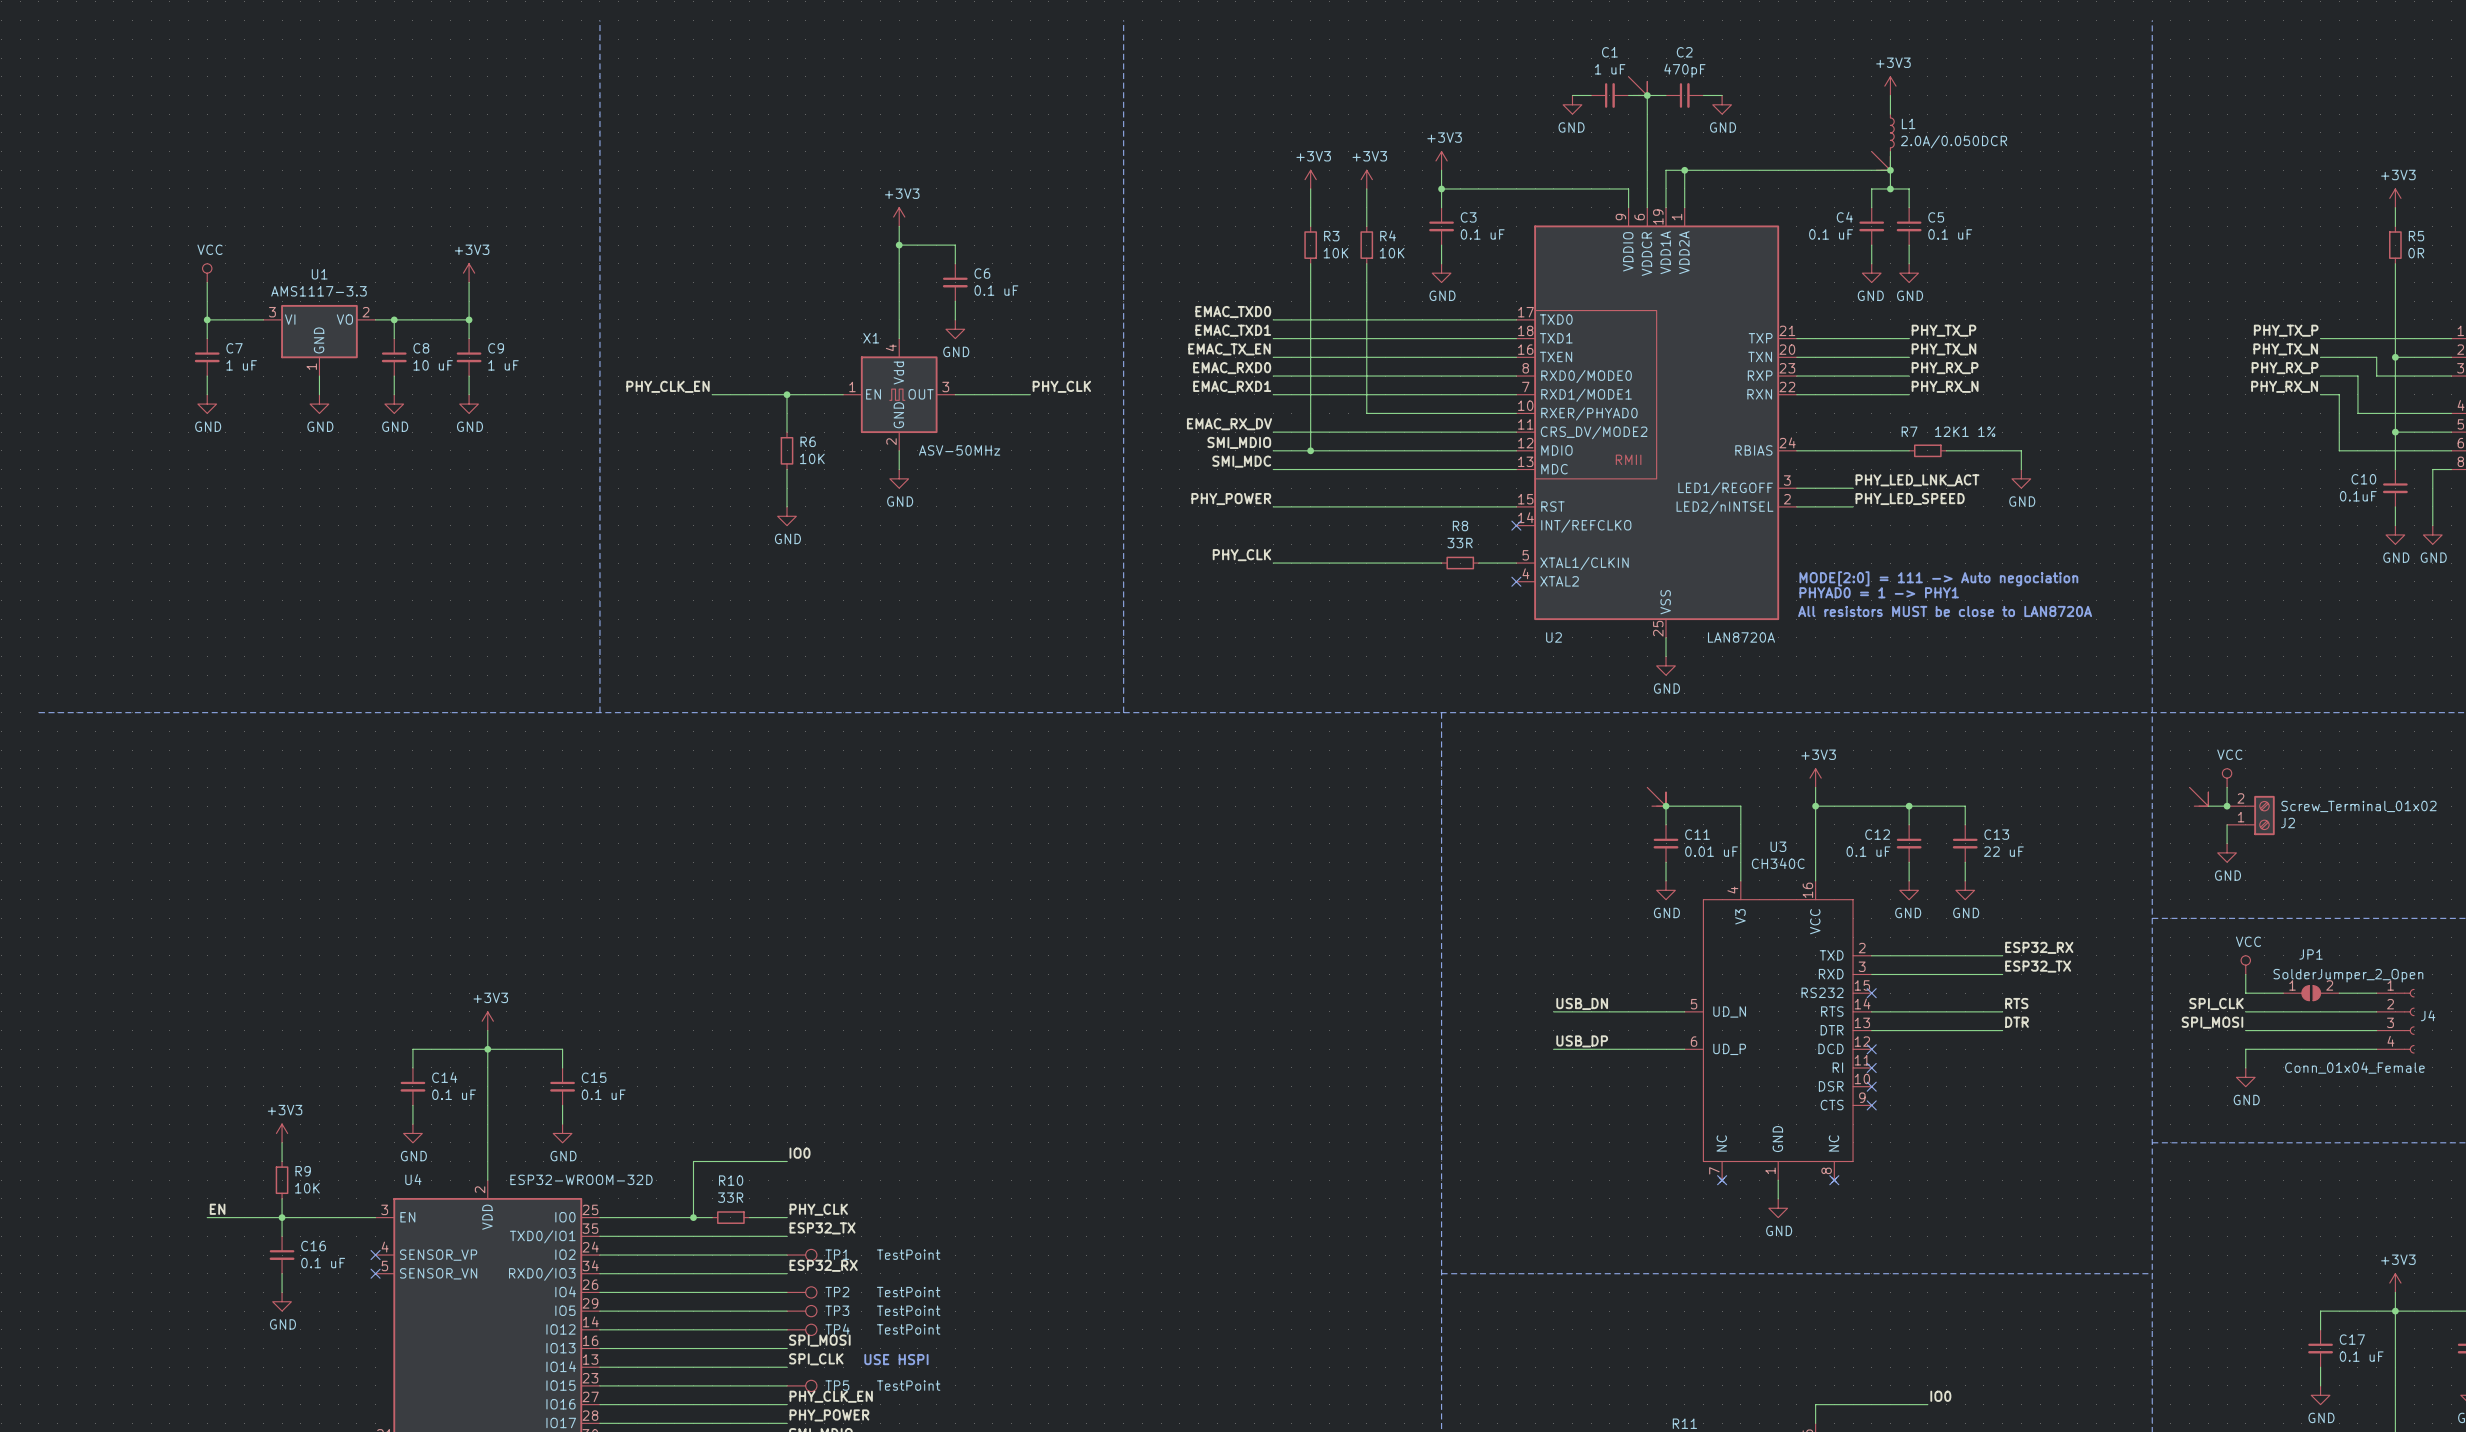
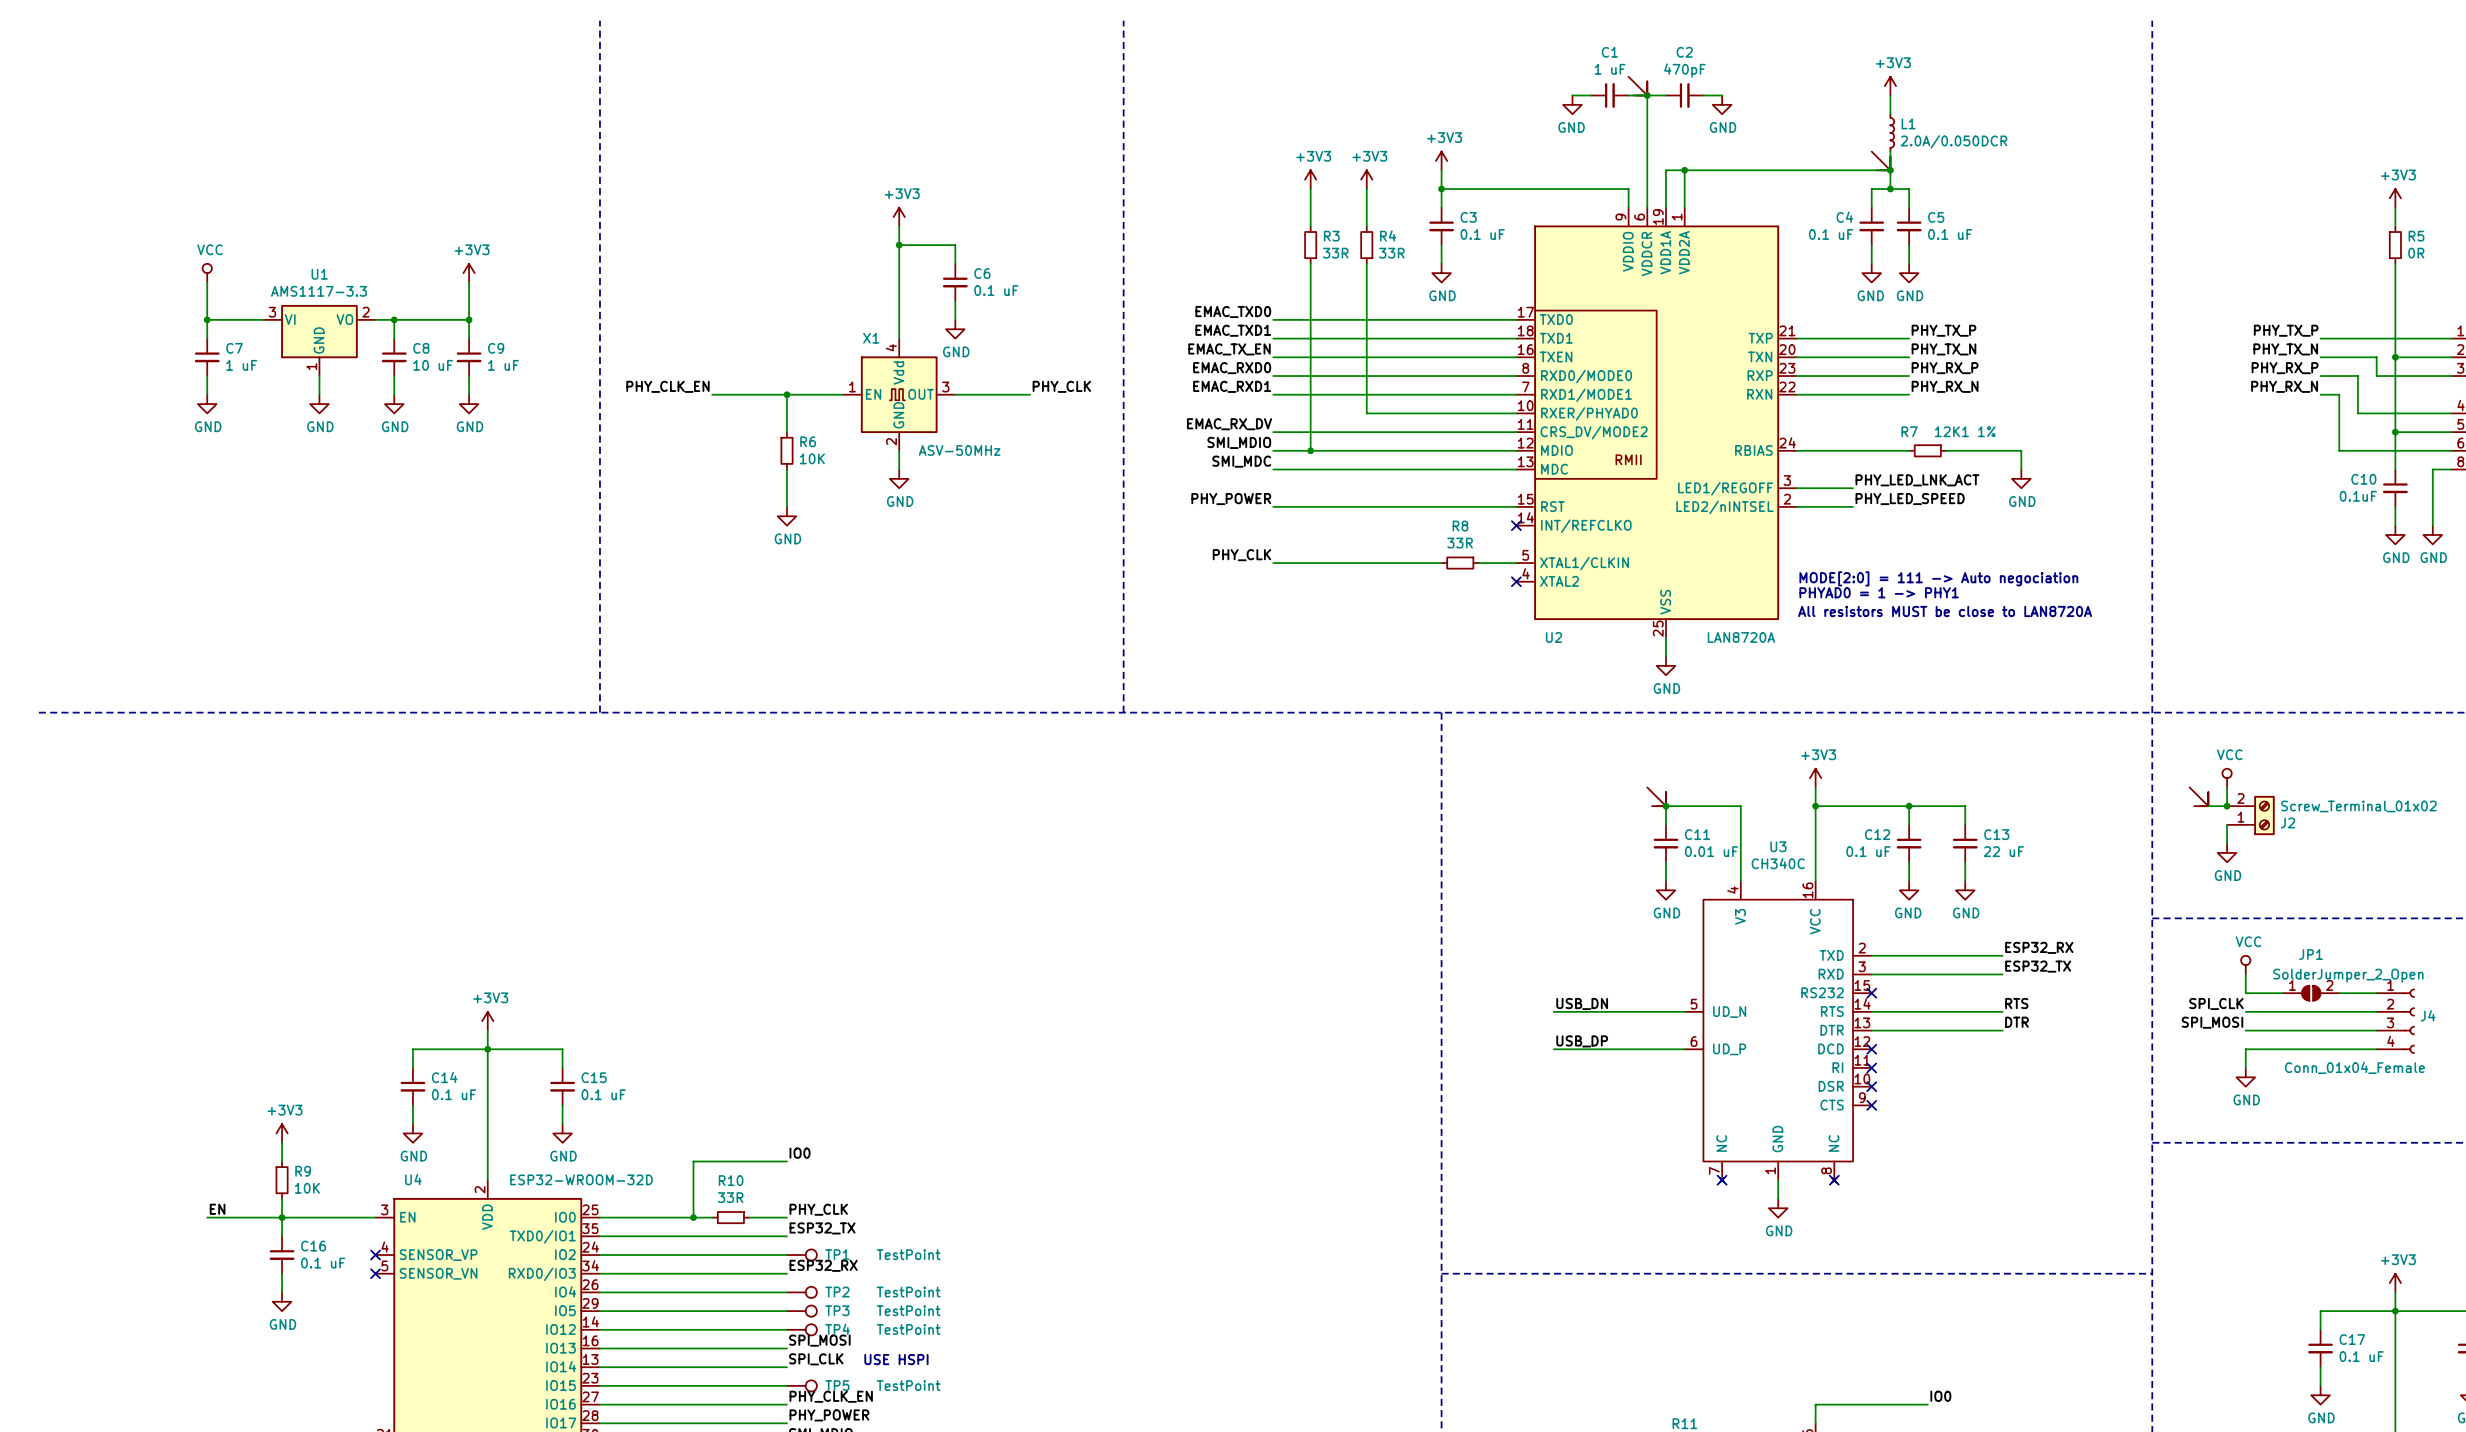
R3 value: 10K (1336, 253) -> 33R (1335, 253)
R4 value: 10K (1392, 253) -> 33R (1391, 253)

